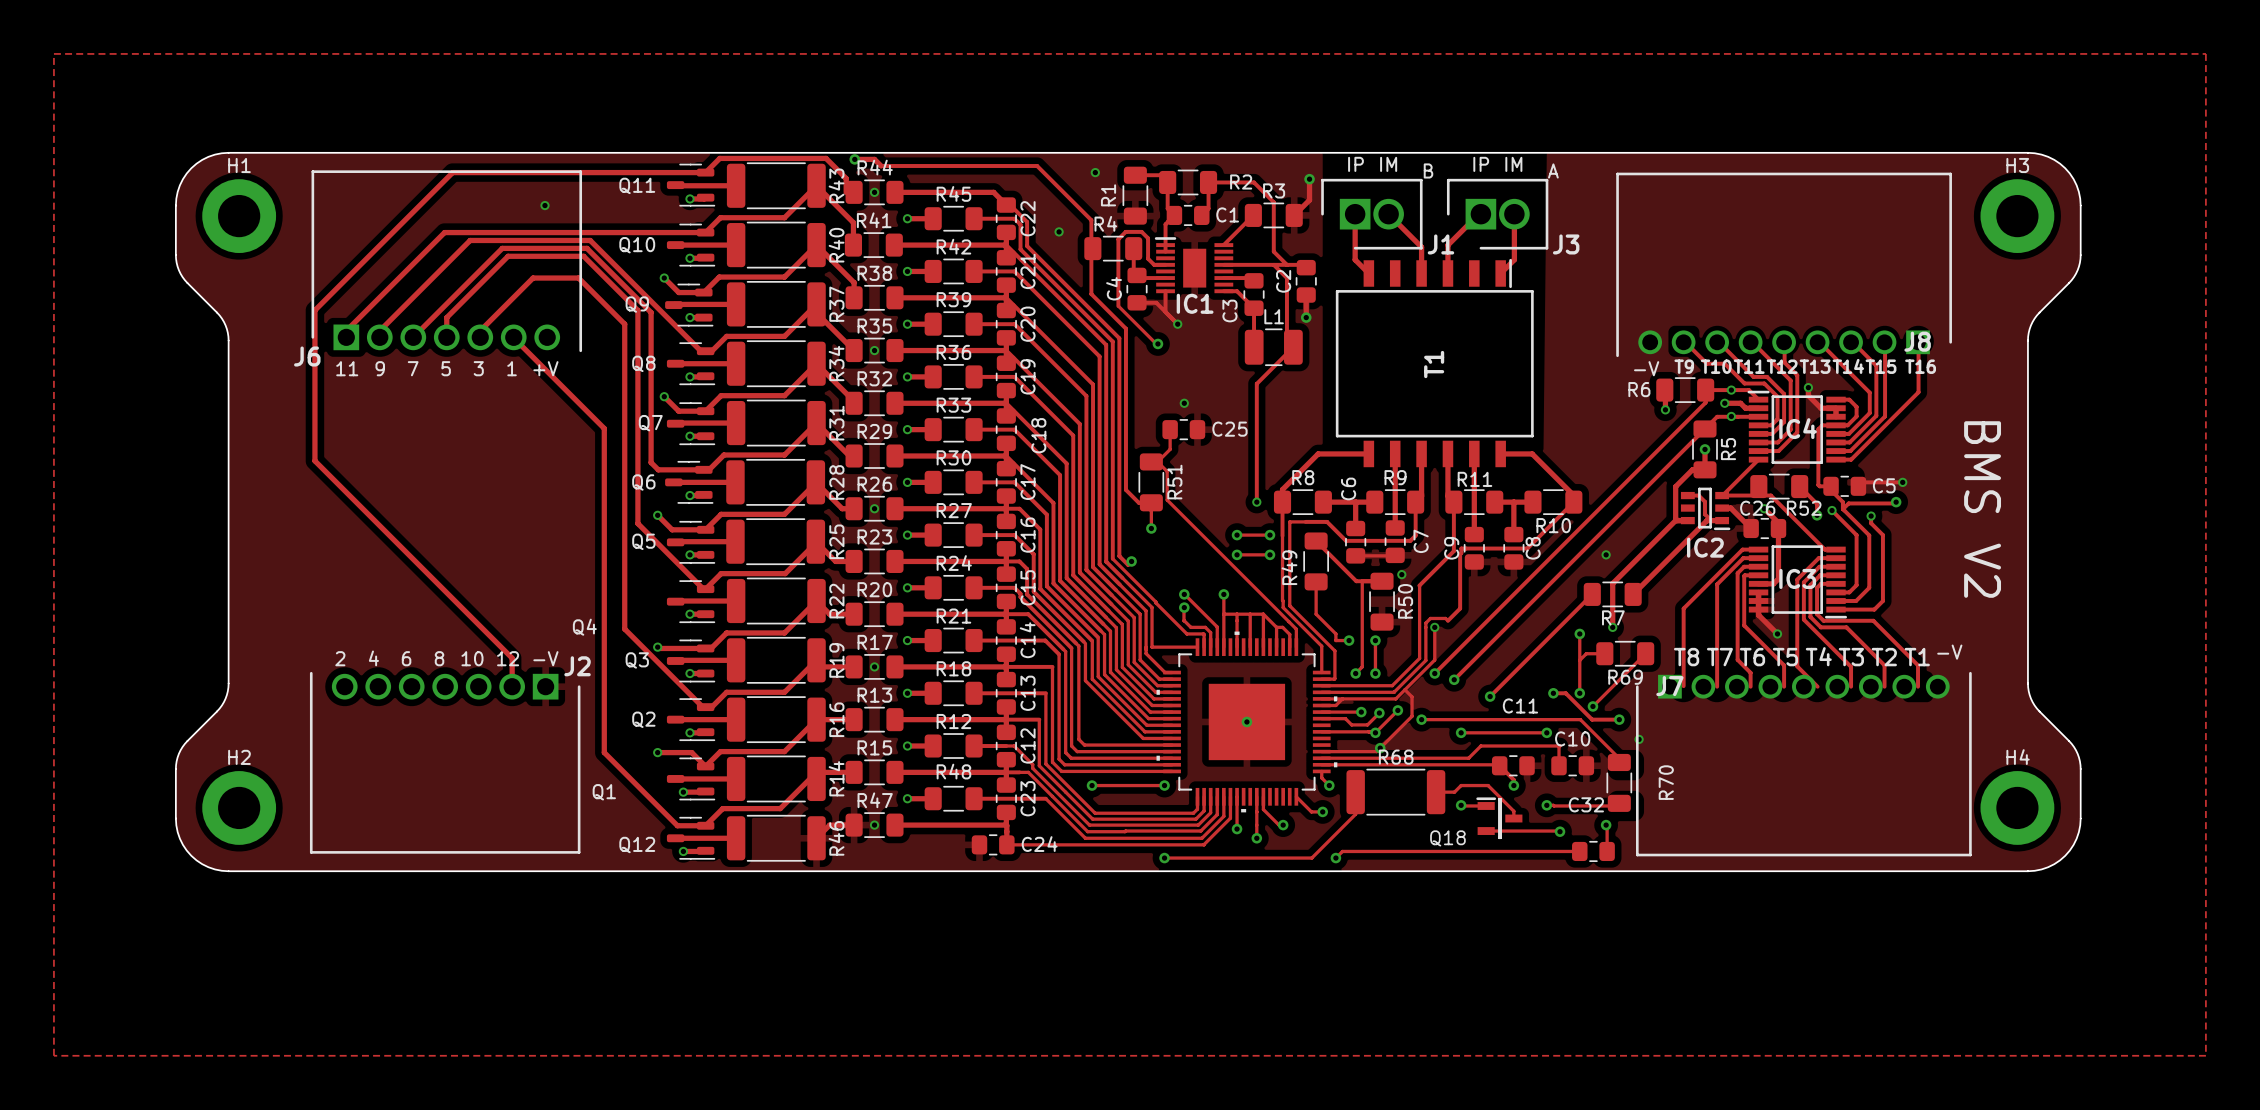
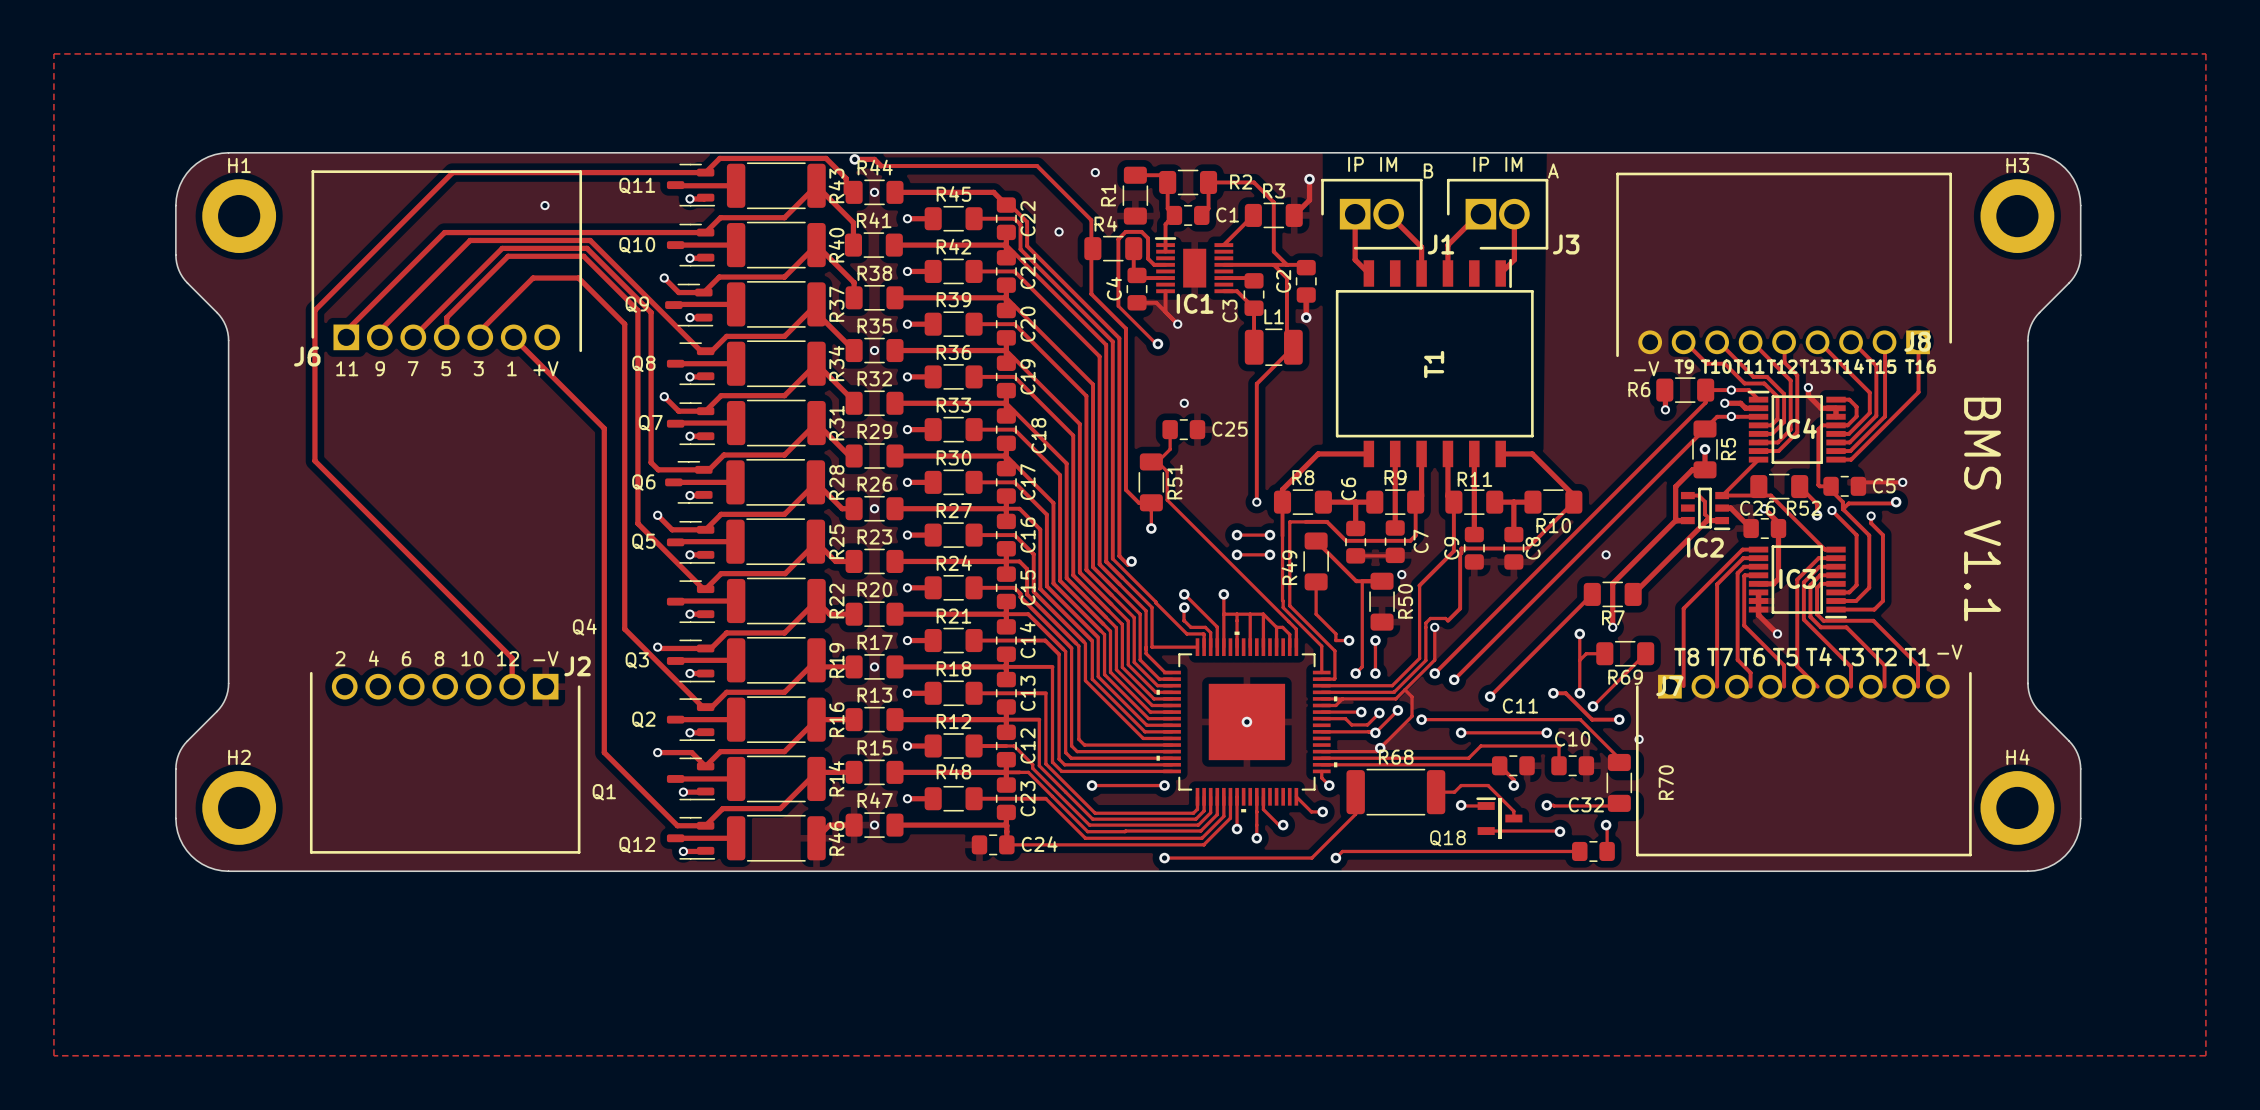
text: BMS V2 (1982, 509) -> BMS V1.1 (1982, 509)

